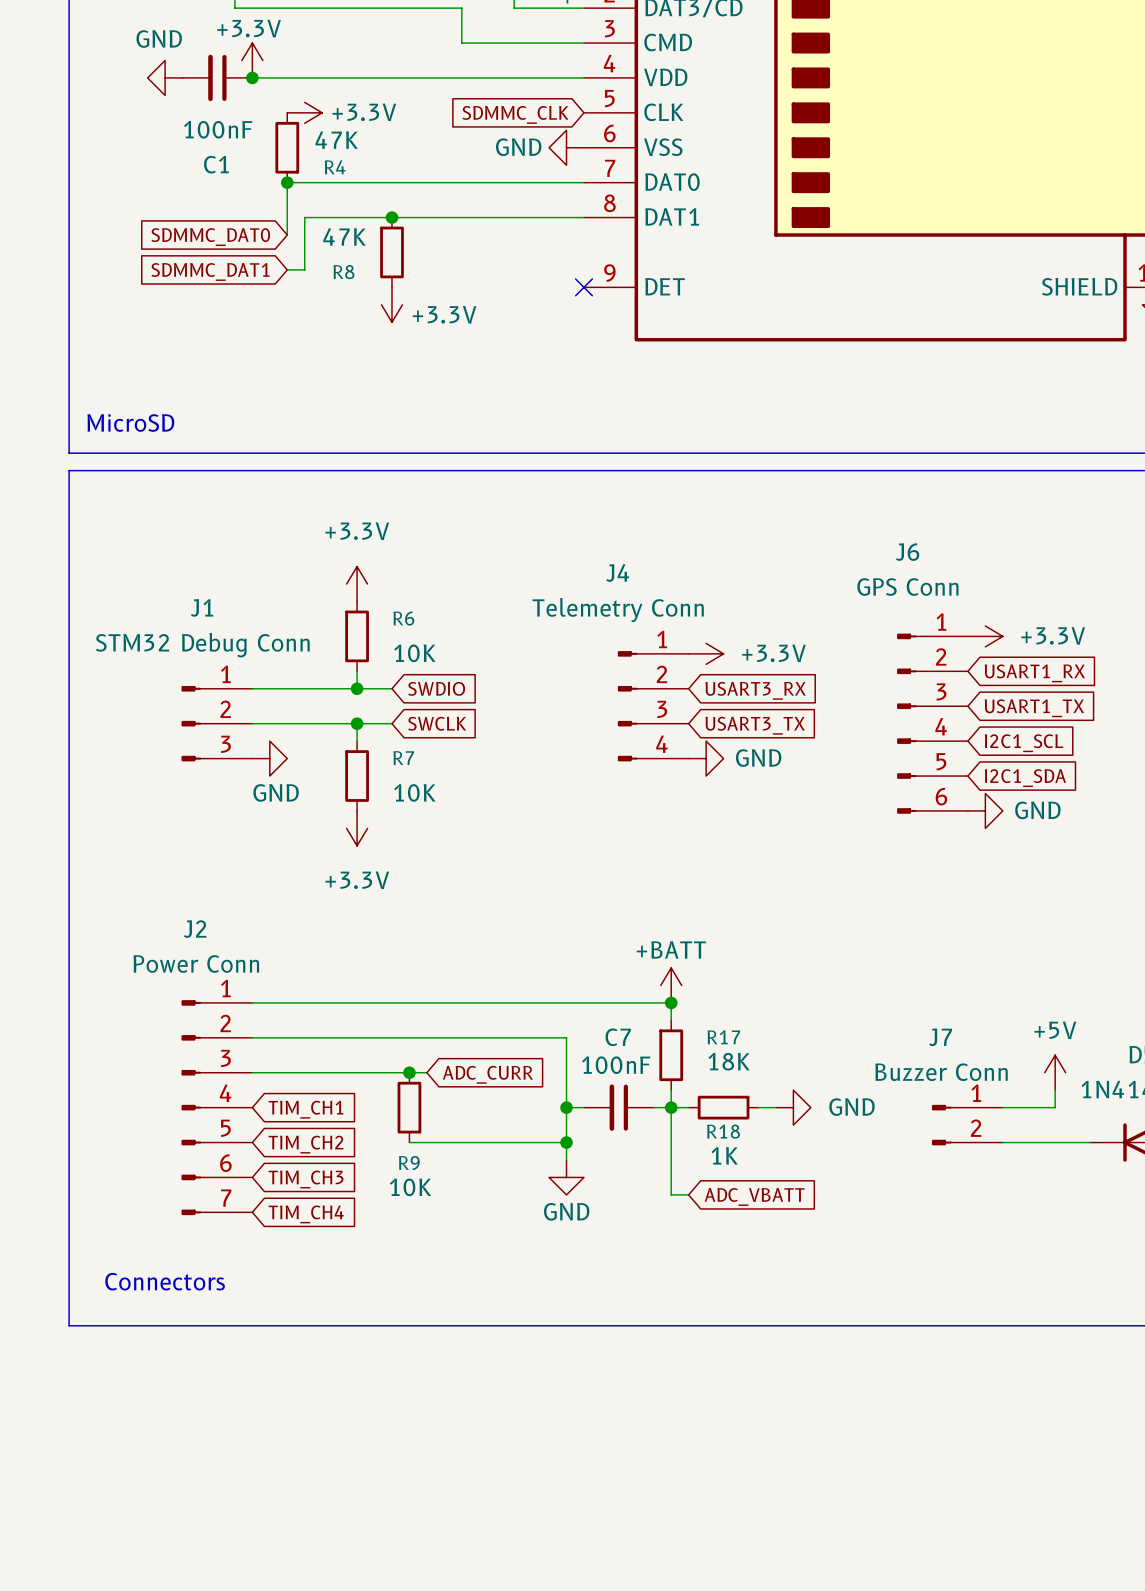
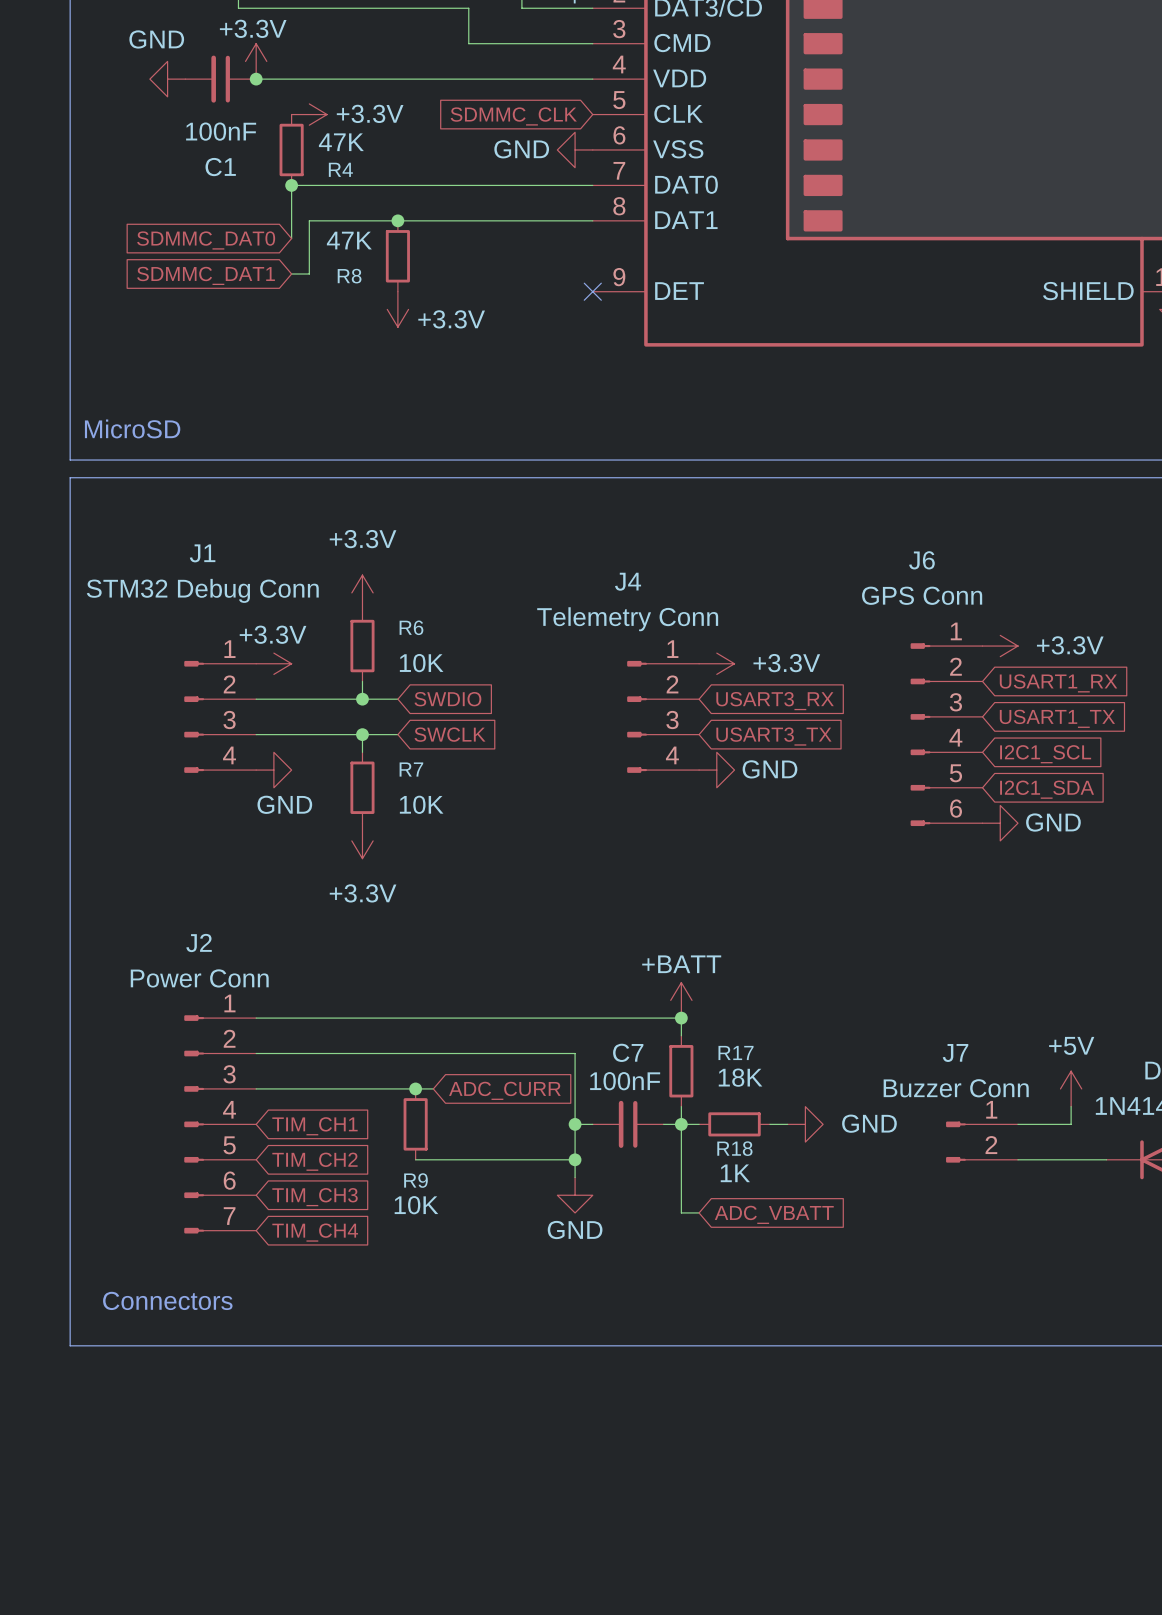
J1 name position: J1 (202, 607) -> J1 (202, 553)
J1 value position: STM32 Debug Conn (202, 645) -> STM32 Debug Conn (202, 590)
power symbol: none -> +3.3V (273, 663)
J1 symbol: [181, 685, 253, 762] -> [184, 660, 257, 773]

